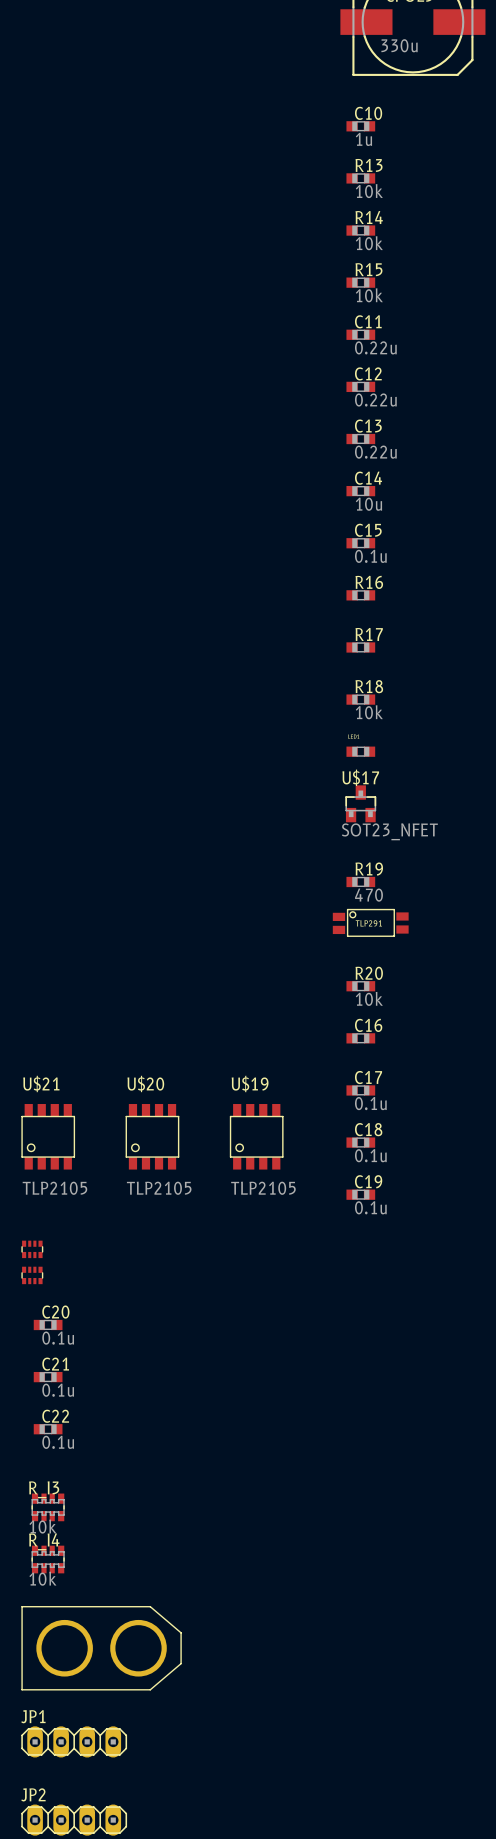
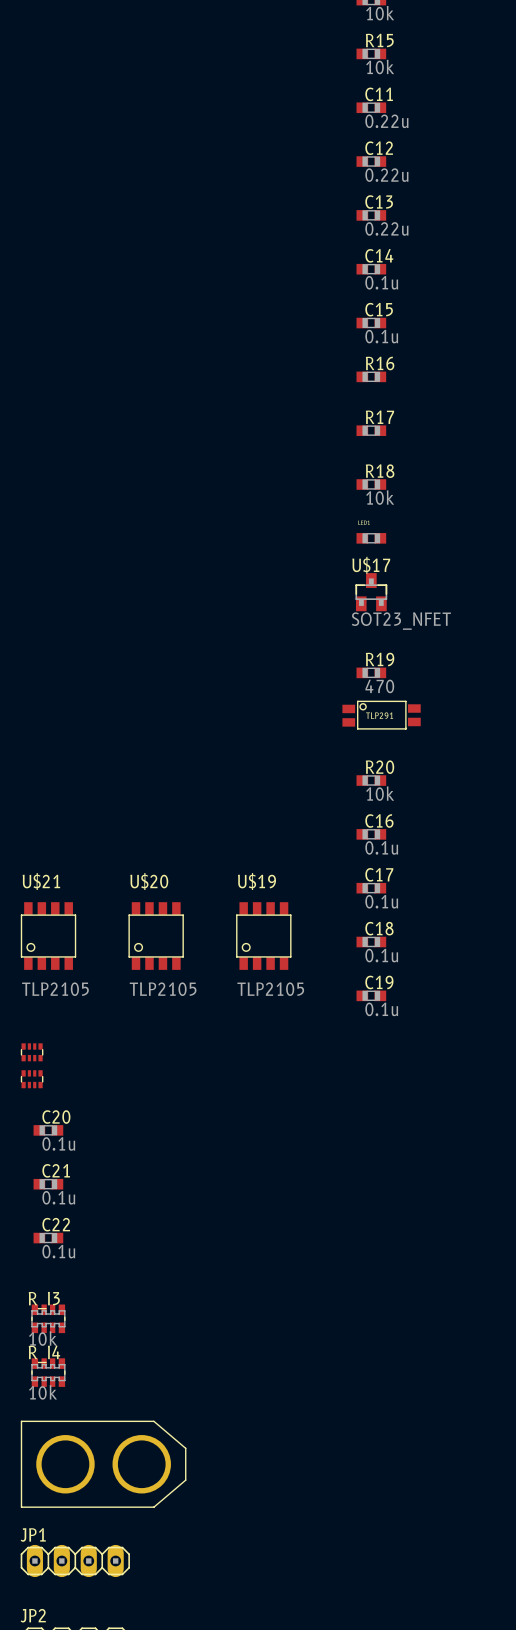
C14 value: 10u (368, 504) -> 0.1u (381, 282)
C16 value: none -> 0.1u (381, 847)

